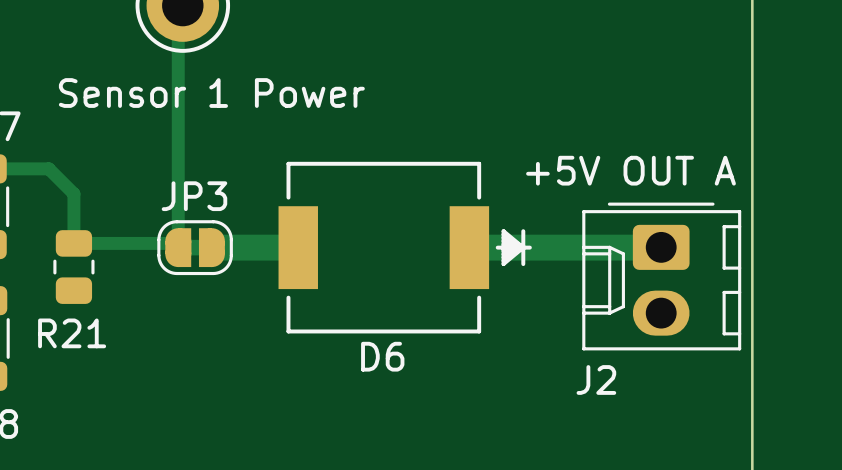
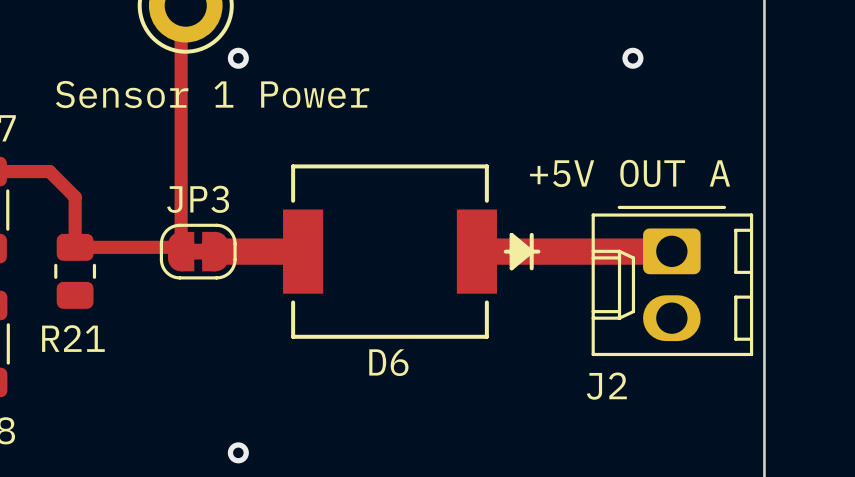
via: none -> (238, 58)
via: none -> (632, 58)
via: none -> (238, 452)

